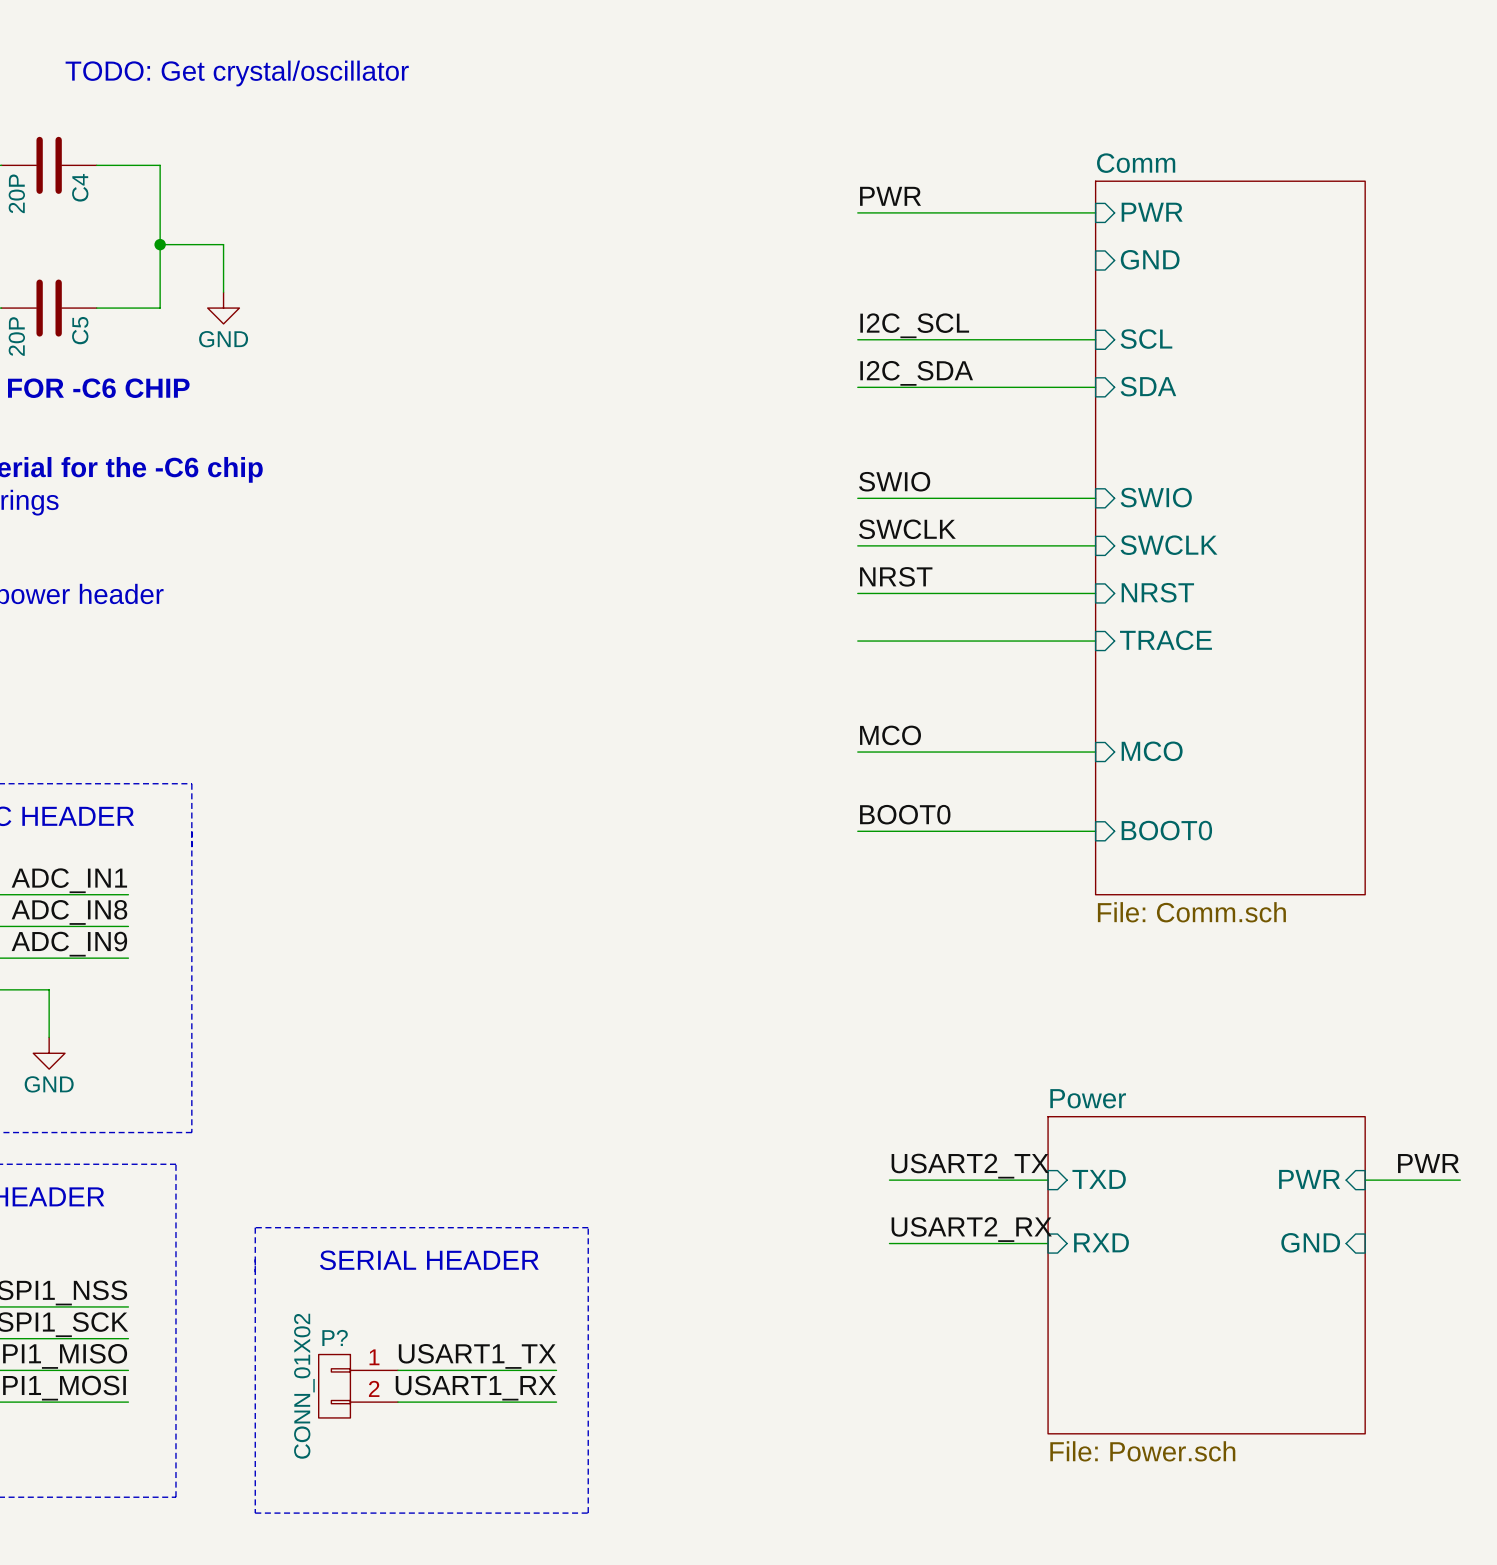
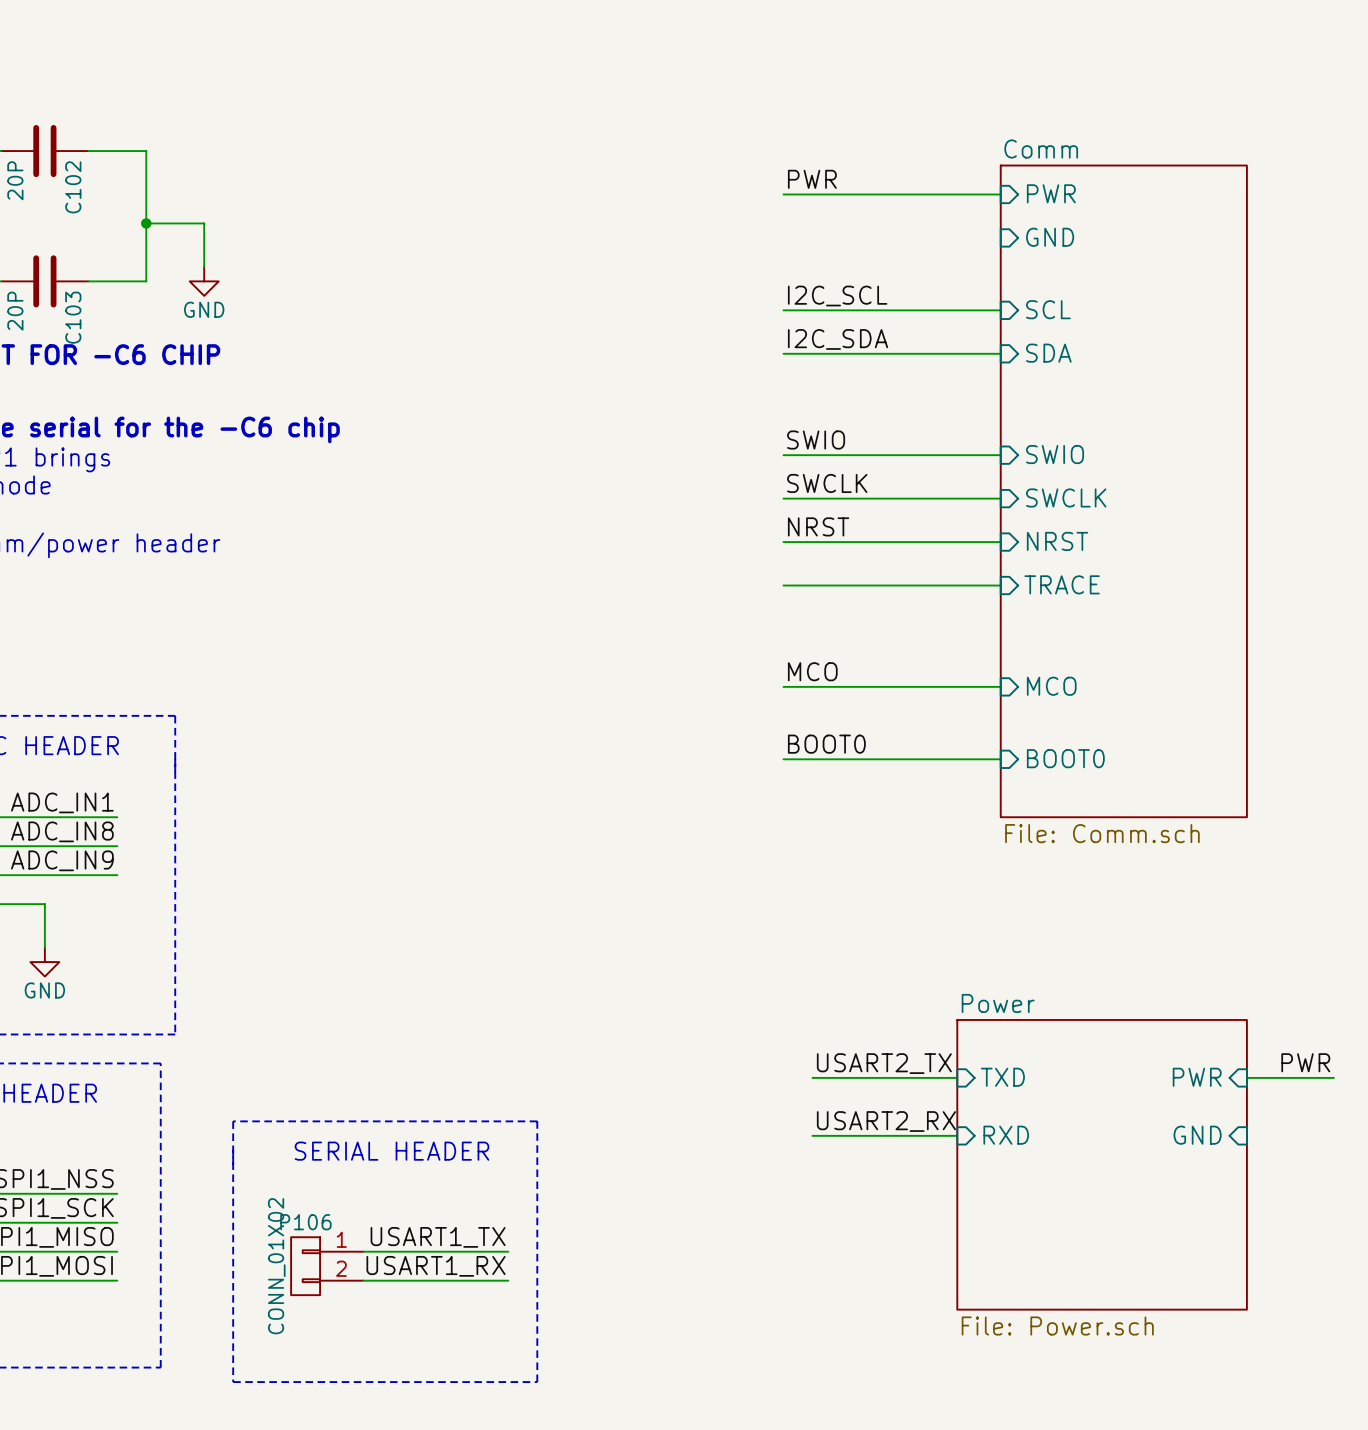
text: TODO: Get crystal/oscillator (237, 73) -> none
C4 name: C4 (80, 187) -> C102 (73, 187)
C5 name: C5 (80, 330) -> C103 (73, 317)
P? name: P? (335, 1337) -> P106 (305, 1222)

